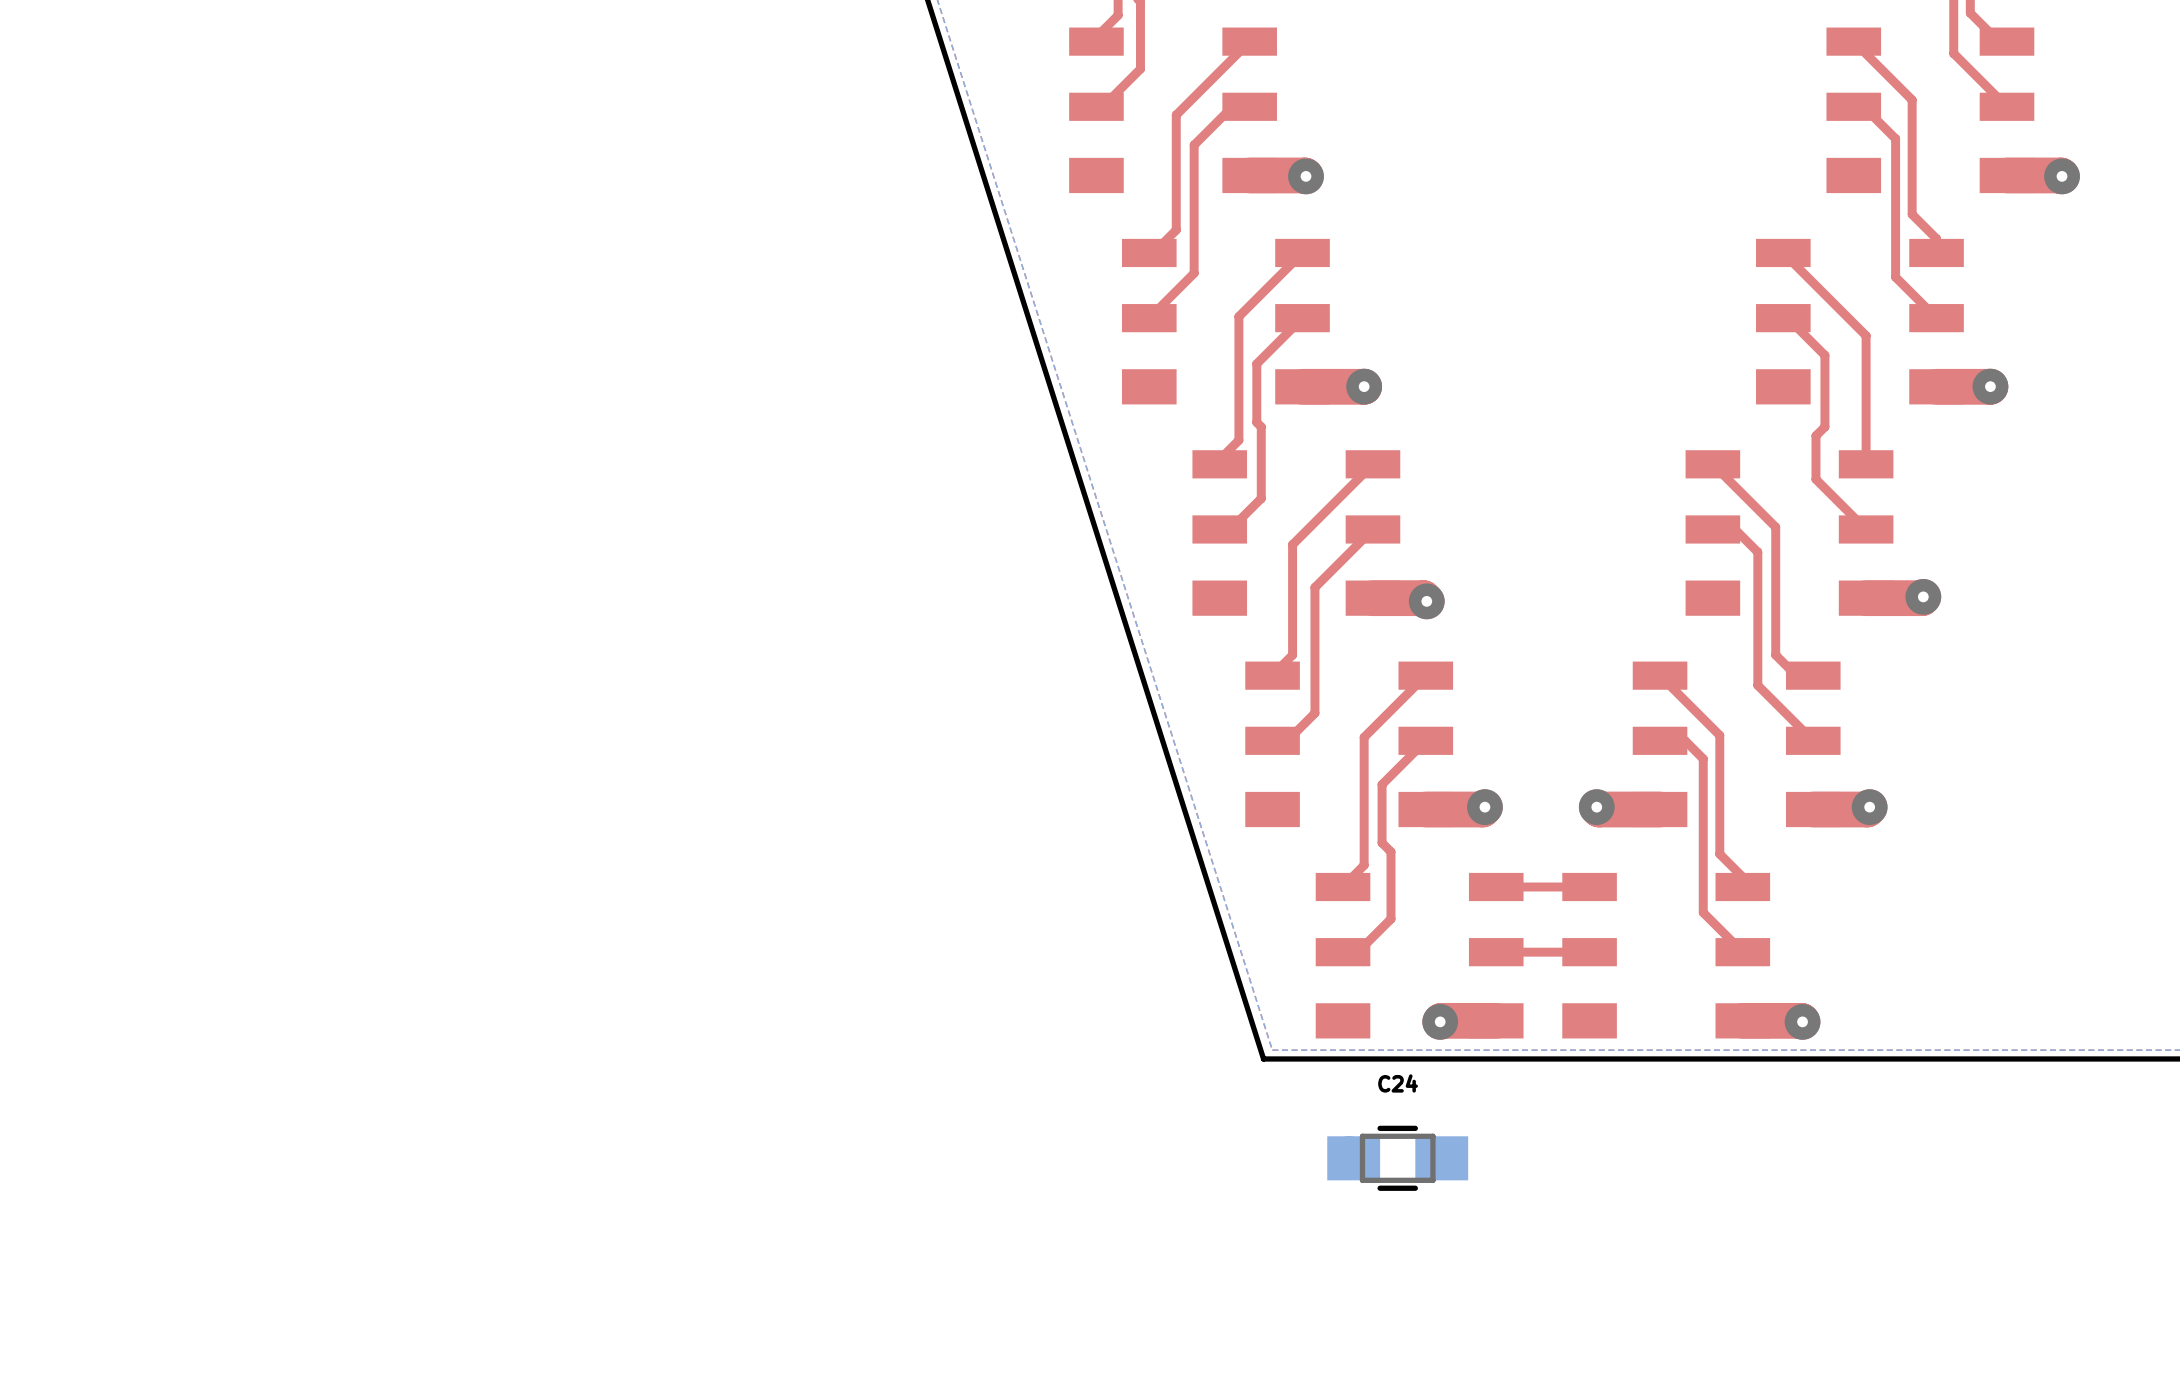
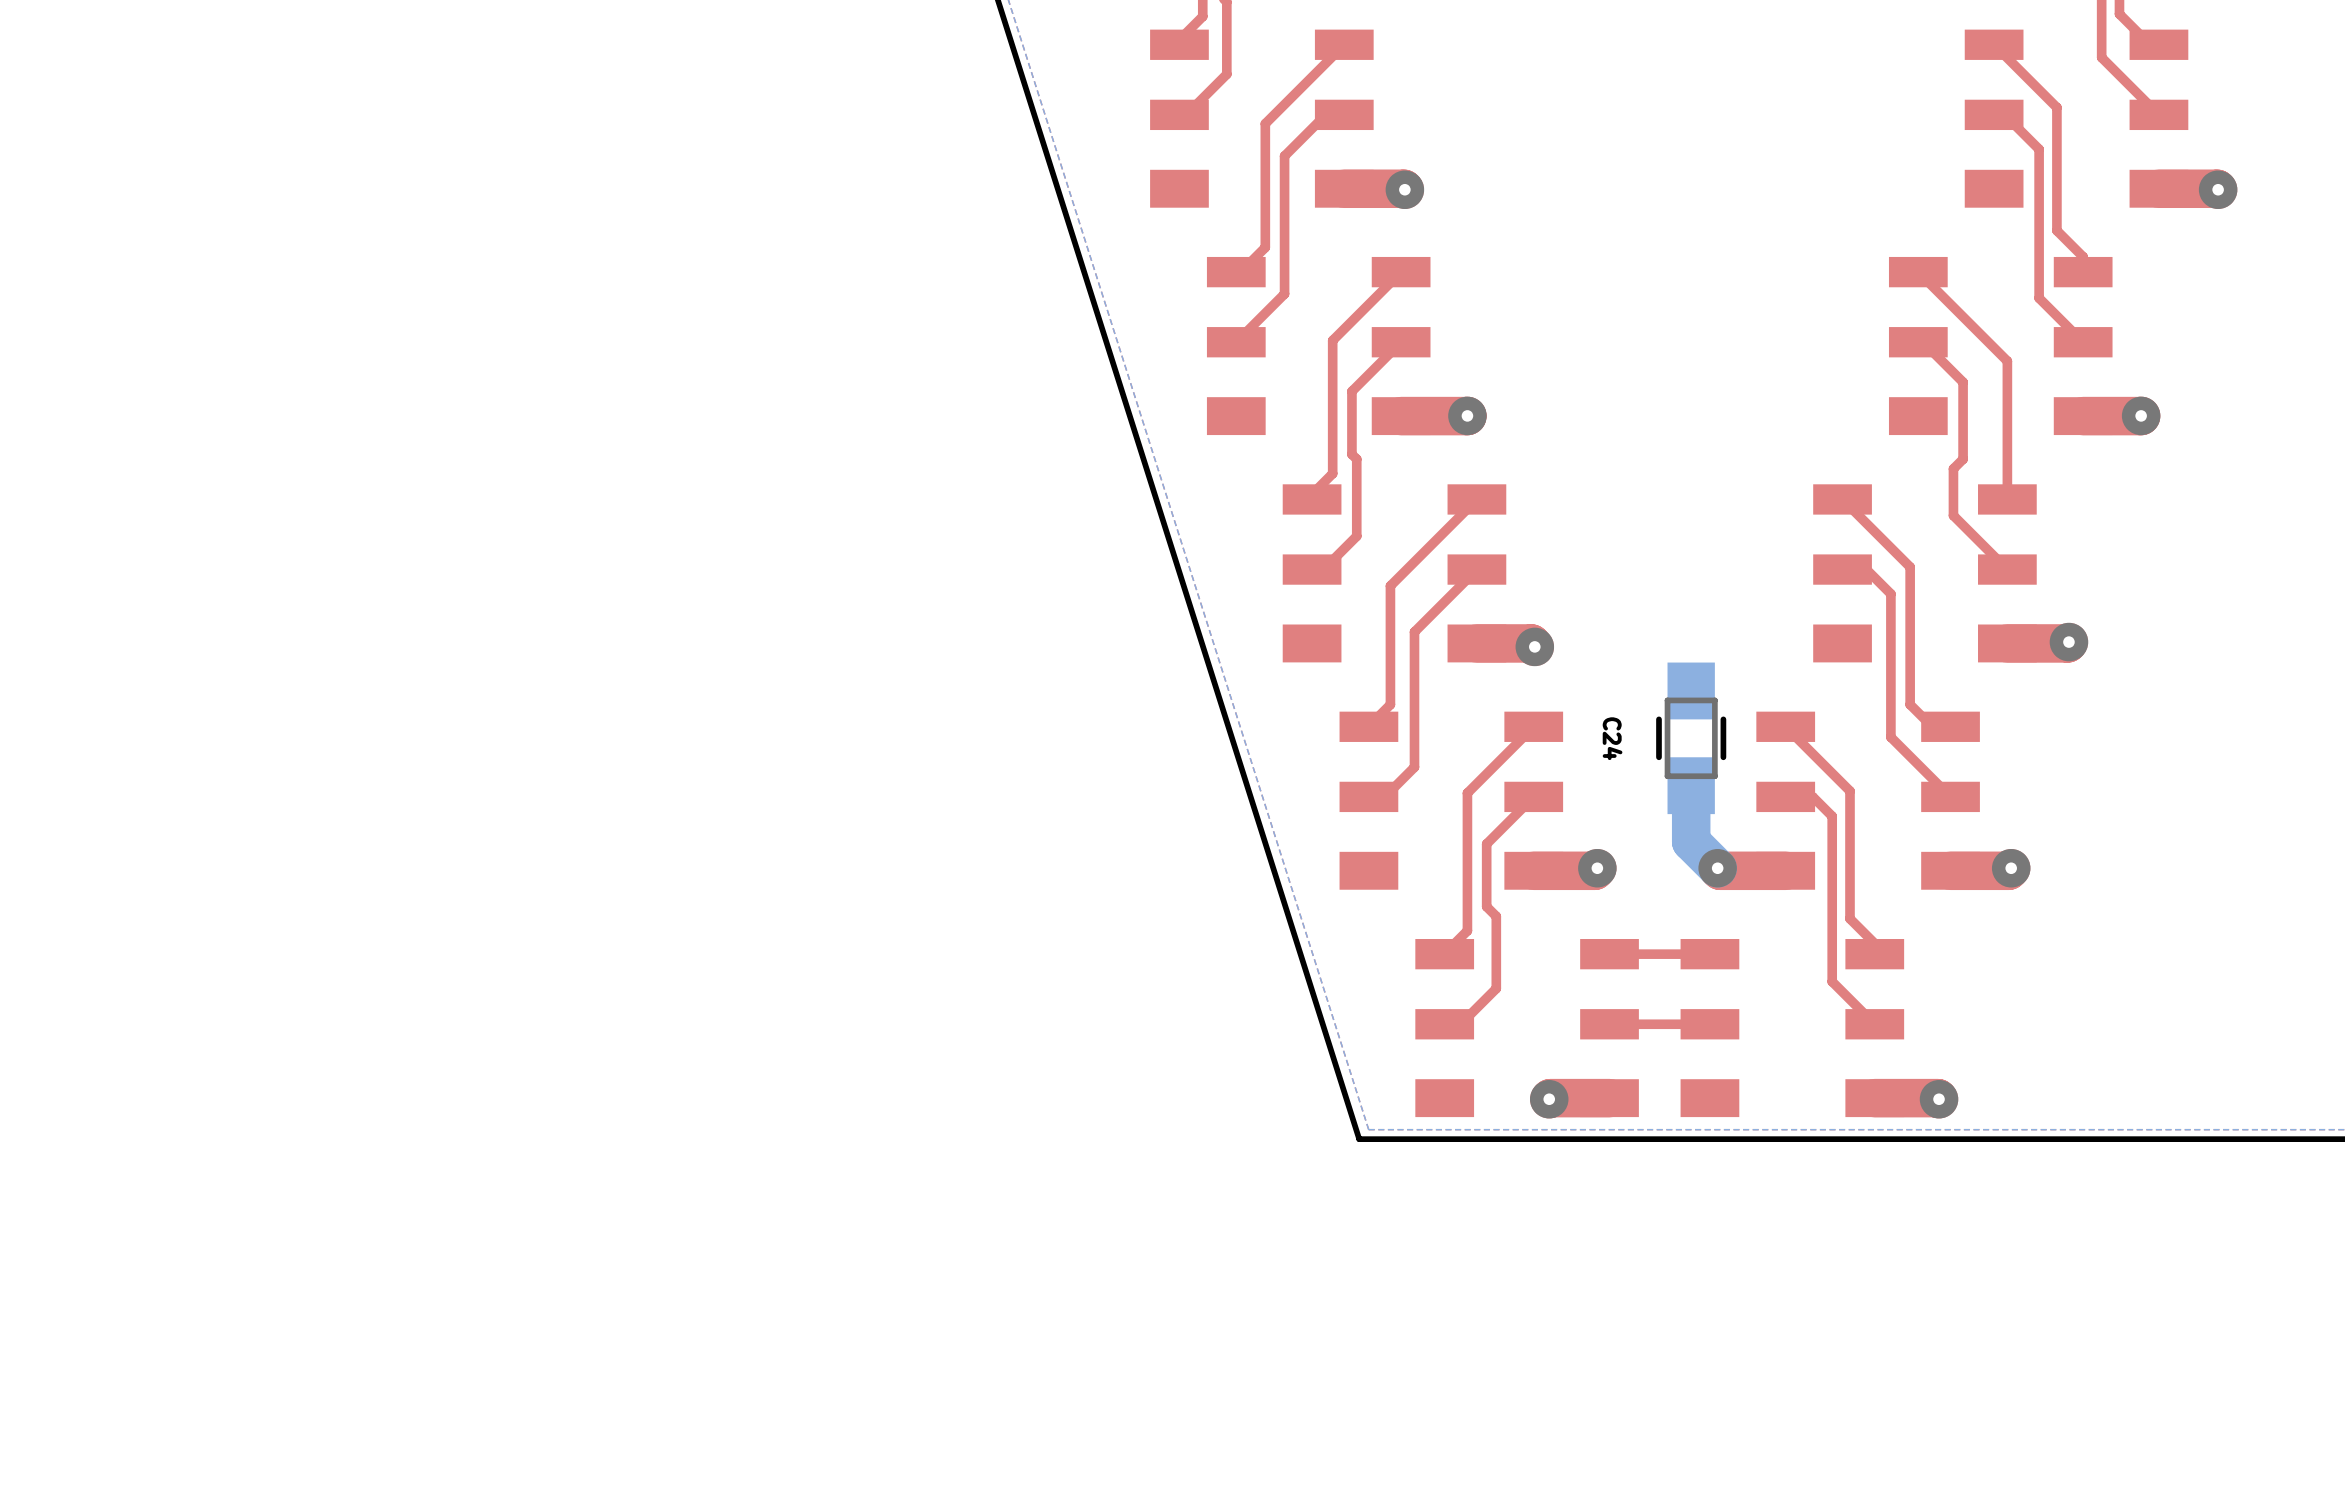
bottom track: none -> (1691, 785) (1691, 841) (1717, 868)
C24 name position: C24 (1398, 1083) -> C24 (1612, 738)
C24 rotation: 0° (1397, 1158) -> 90° clockwise (1691, 738)
C24 position: (1397, 1158) -> (1691, 738)

